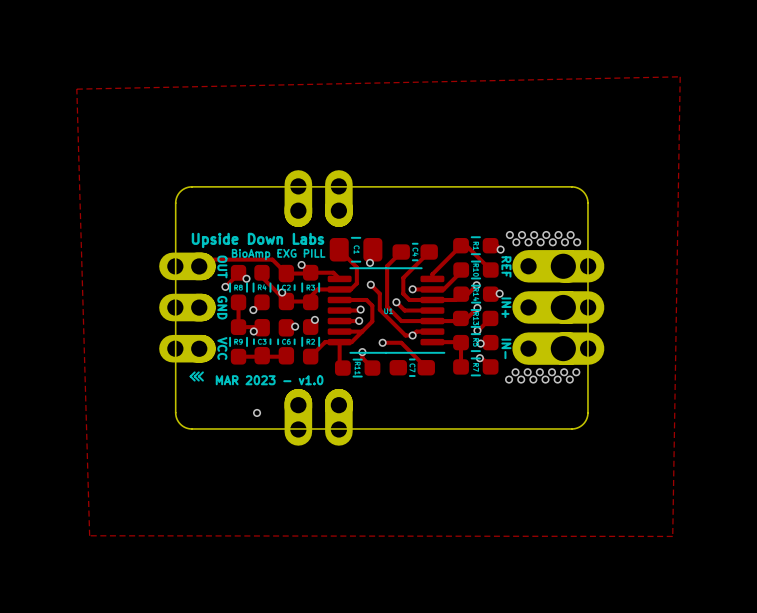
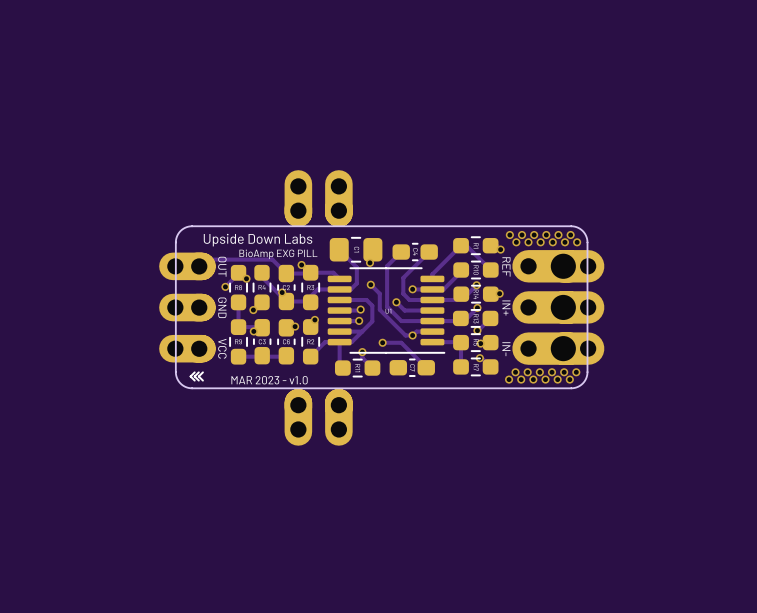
zone outline: (680, 76) (76, 89) (89, 535) (672, 536) (680, 76) -> none
board edge: (191, 186) (571, 186) (580, 189) (586, 196) (587, 203) (587, 412) (585, 421) (578, 427) (571, 428) (191, 428) (183, 426) (178, 421) (175, 412) (175, 203) (180, 191) (191, 186) -> (192, 226) (180, 231) (175, 242) (175, 373) (179, 382) (186, 387) (571, 388) (581, 384) (586, 377) (587, 240) (583, 232) (576, 227) (192, 226)
via: (257, 412) -> none

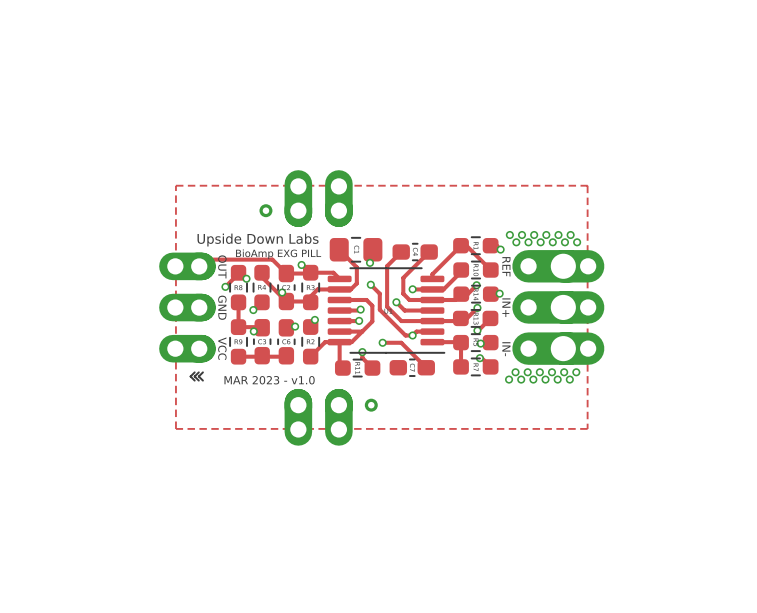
zone outline: none -> (175, 185) (175, 428) (587, 428) (587, 185) (175, 185)
via: none -> (265, 210)
board edge: (192, 226) (576, 227) (583, 232) (587, 240) (586, 377) (581, 384) (571, 388) (186, 387) (179, 382) (175, 373) (175, 242) (180, 231) (192, 226) -> none
via: none -> (371, 405)

